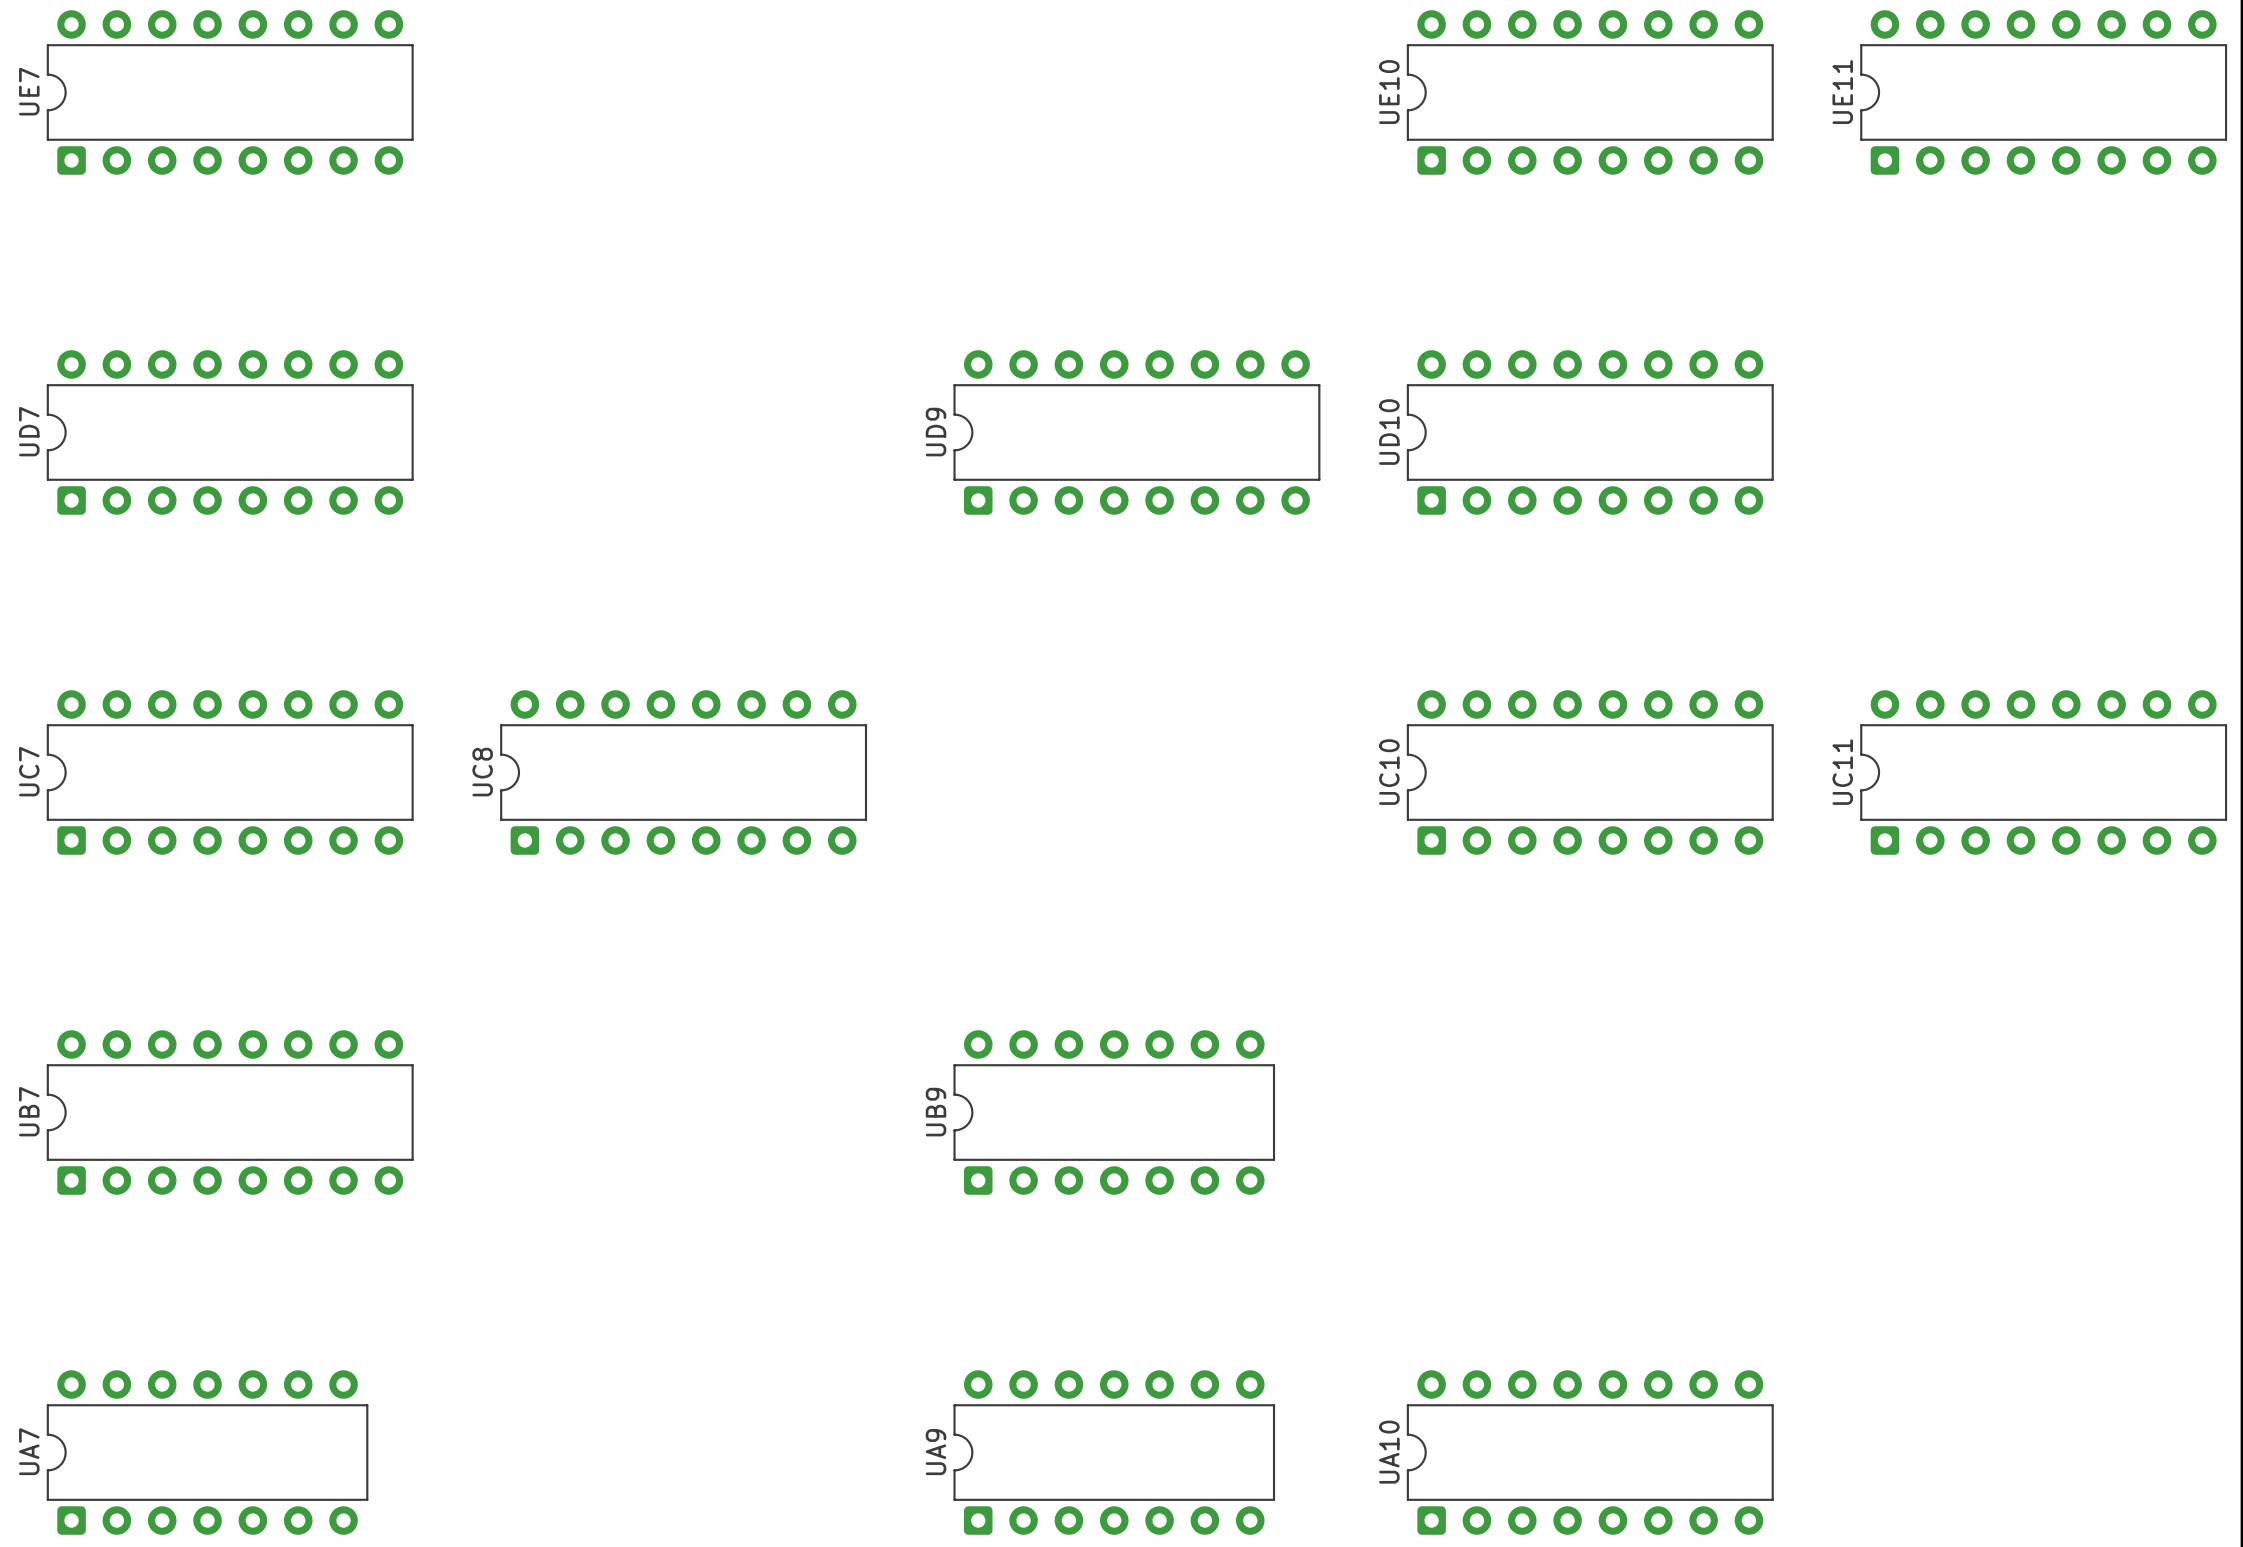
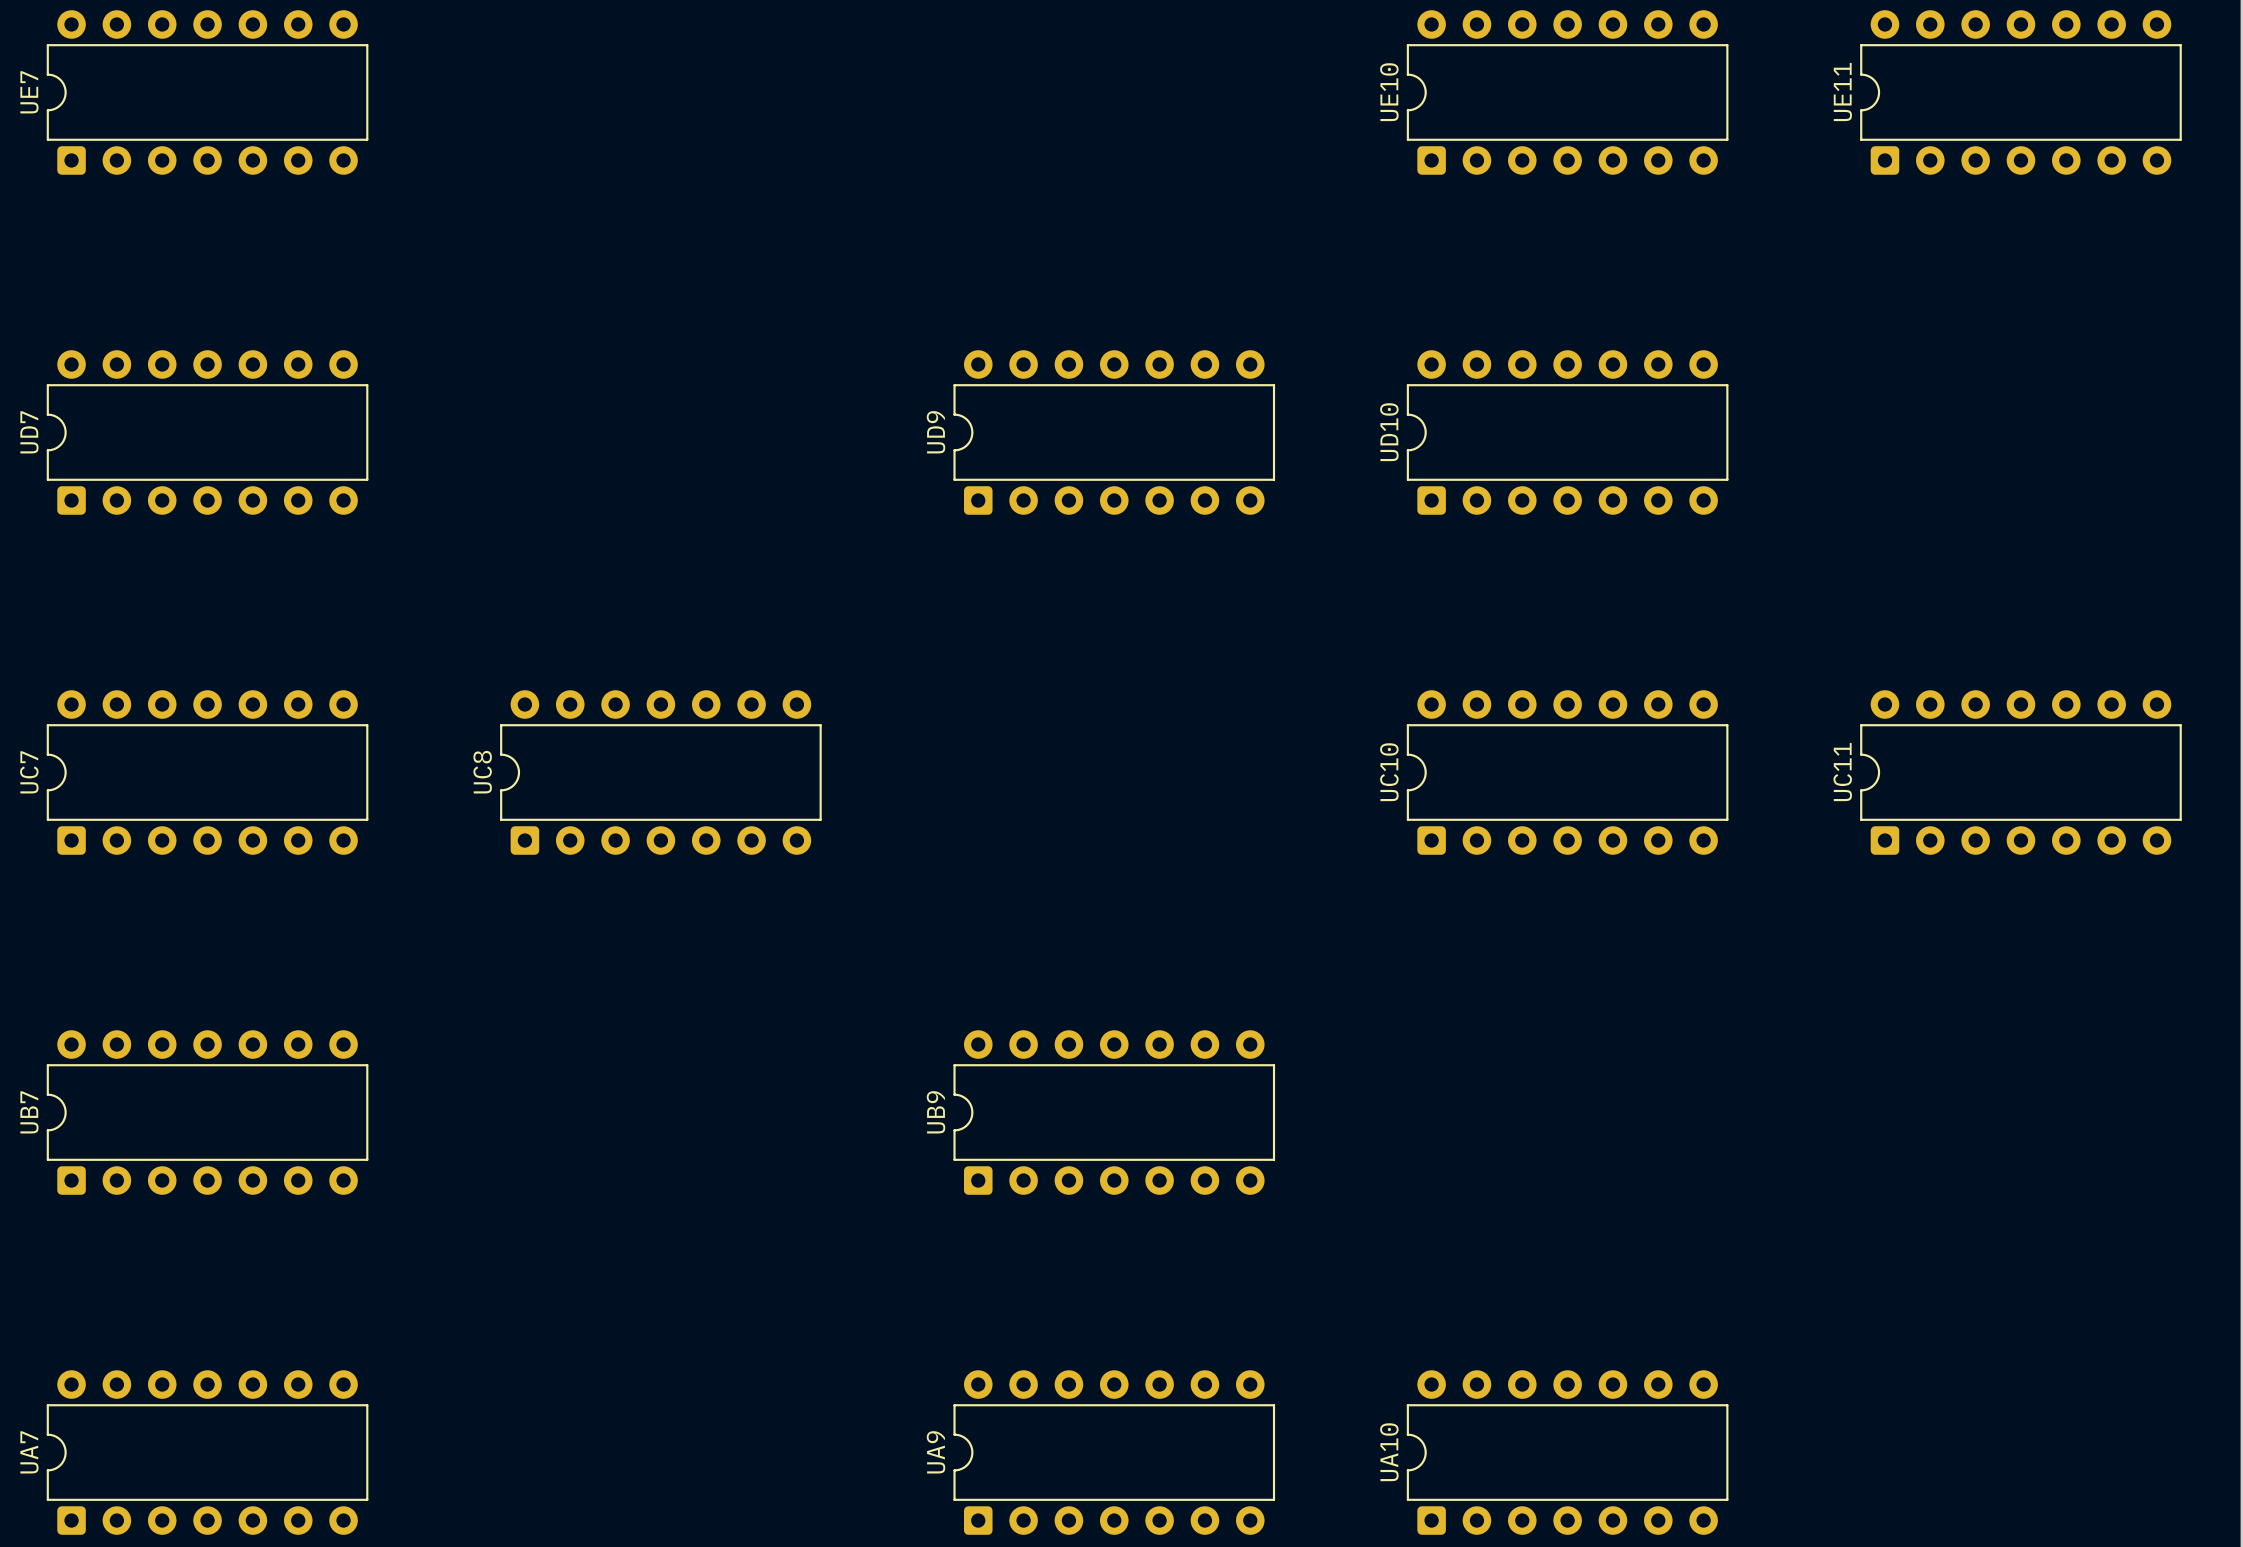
UE7 footprint: [46, 10, 414, 175] -> [46, 10, 369, 175]
UE10 footprint: [1406, 10, 1774, 175] -> [1406, 10, 1729, 175]
UE11 footprint: [1860, 10, 2228, 175] -> [1860, 10, 2182, 175]
UD7 footprint: [46, 350, 414, 515] -> [46, 350, 369, 515]
UD9 footprint: [953, 350, 1321, 515] -> [953, 350, 1276, 515]
UD10 footprint: [1406, 350, 1774, 515] -> [1406, 350, 1729, 515]
UC7 footprint: [46, 690, 414, 855] -> [46, 690, 369, 855]
UC8 footprint: [500, 690, 868, 855] -> [500, 690, 822, 855]
UC10 footprint: [1406, 690, 1774, 855] -> [1406, 690, 1729, 855]
UC11 footprint: [1860, 690, 2228, 855] -> [1860, 690, 2182, 855]
UB7 footprint: [46, 1030, 414, 1195] -> [46, 1030, 369, 1195]
UA10 footprint: [1406, 1370, 1774, 1535] -> [1406, 1370, 1729, 1535]

